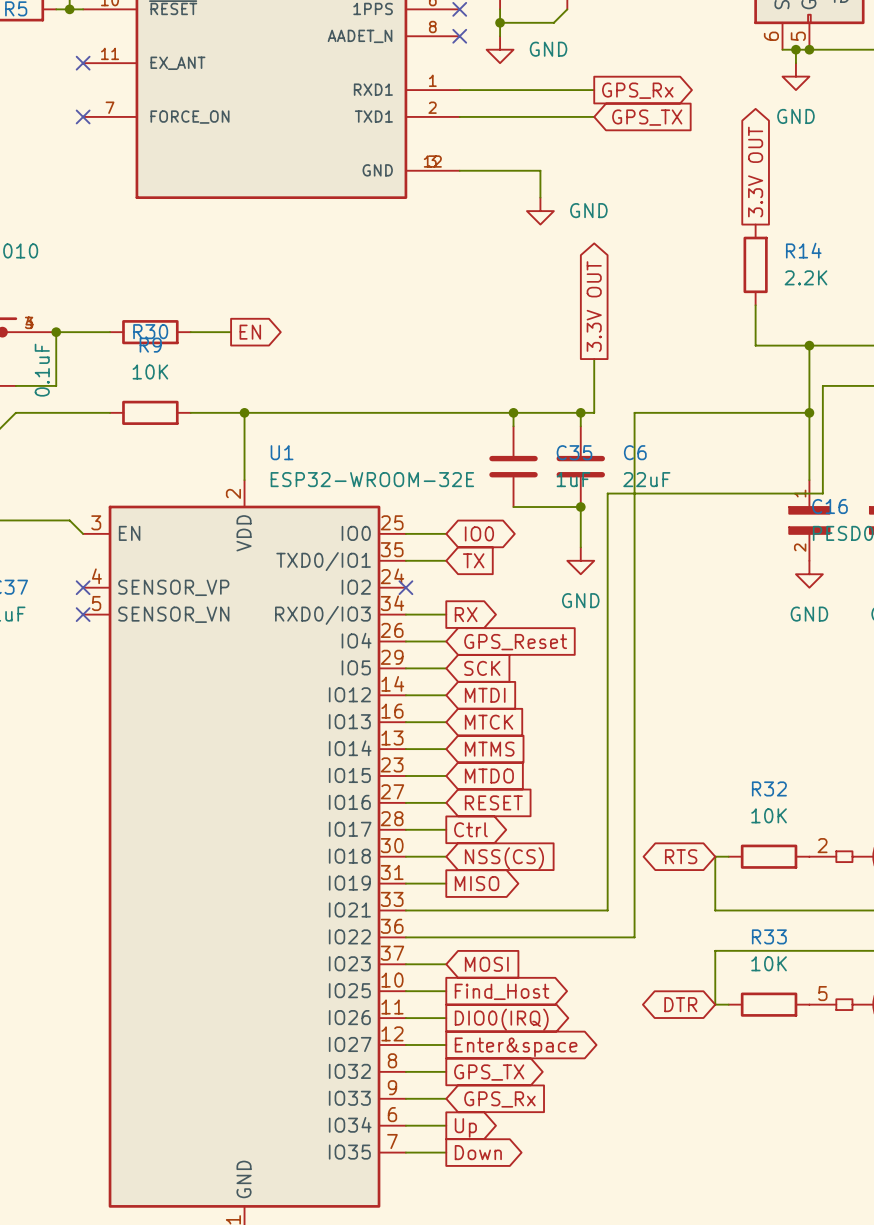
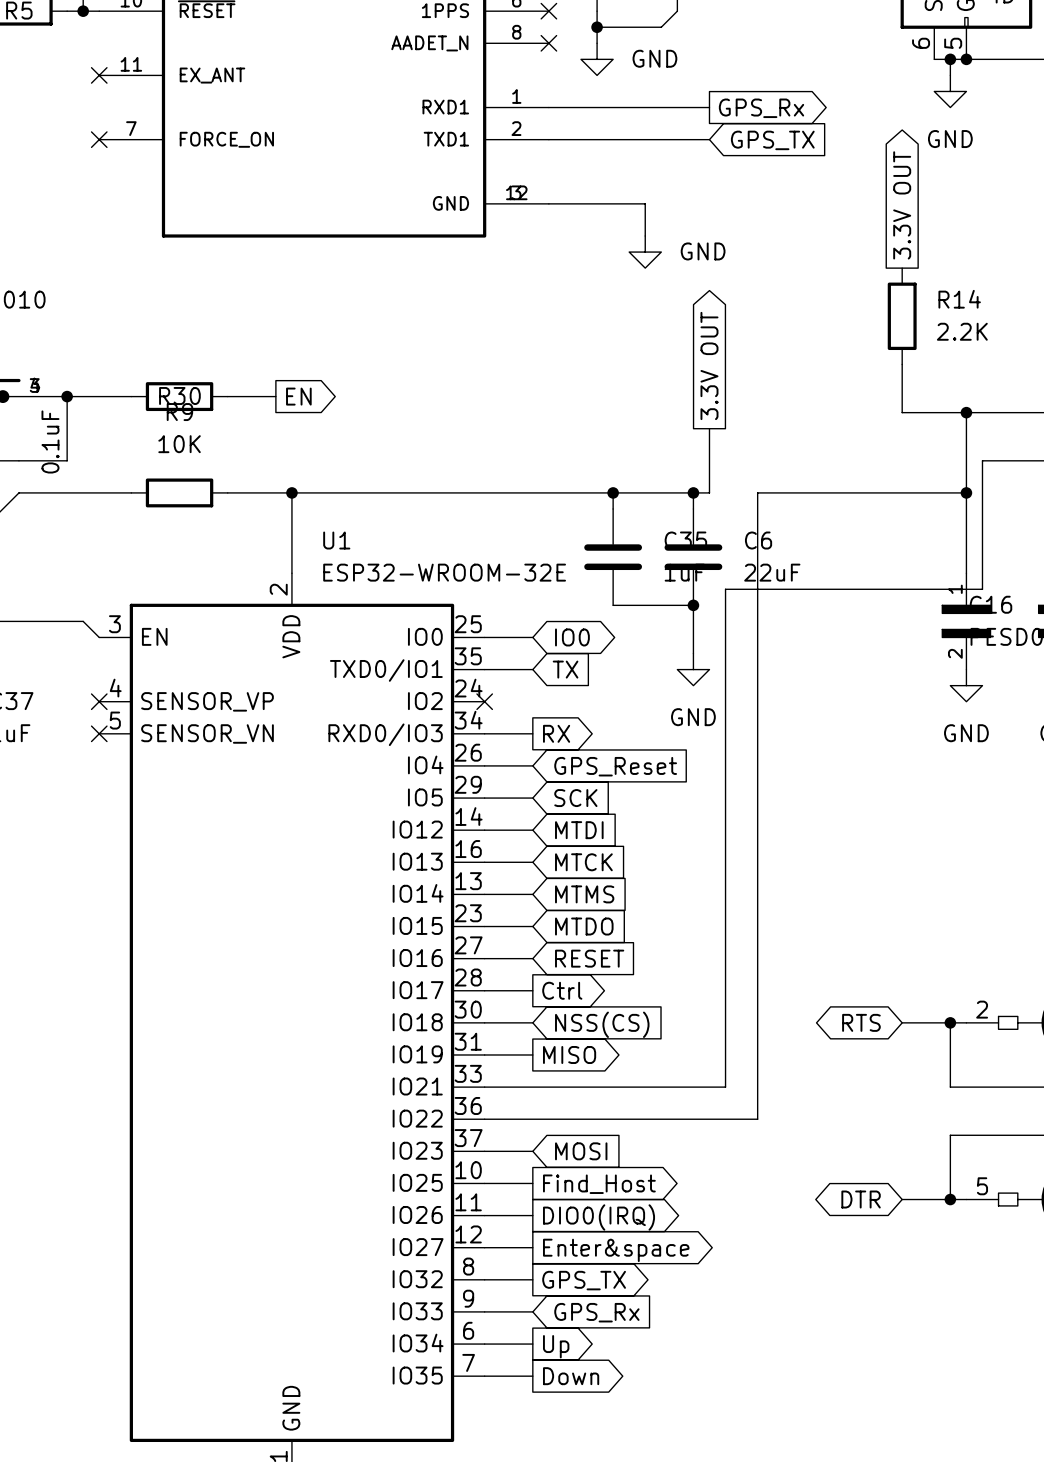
global label position: RTS (681, 856) -> RTS (861, 1022)
wire: (728, 856) (715, 856) (715, 910) (795, 910) -> (950, 1022) (950, 1087)
wire: none -> (902, 1022) (966, 1022)
R32: 10K (769, 856) -> none
junction: none -> (950, 1022)
wire: (795, 950) (715, 950) (715, 1004) (728, 1004) -> (950, 1135) (950, 1199)
global label position: DTR (680, 1004) -> DTR (861, 1199)
wire: none -> (902, 1199) (966, 1199)
R33: 10K (769, 1004) -> none
junction: none -> (950, 1199)

